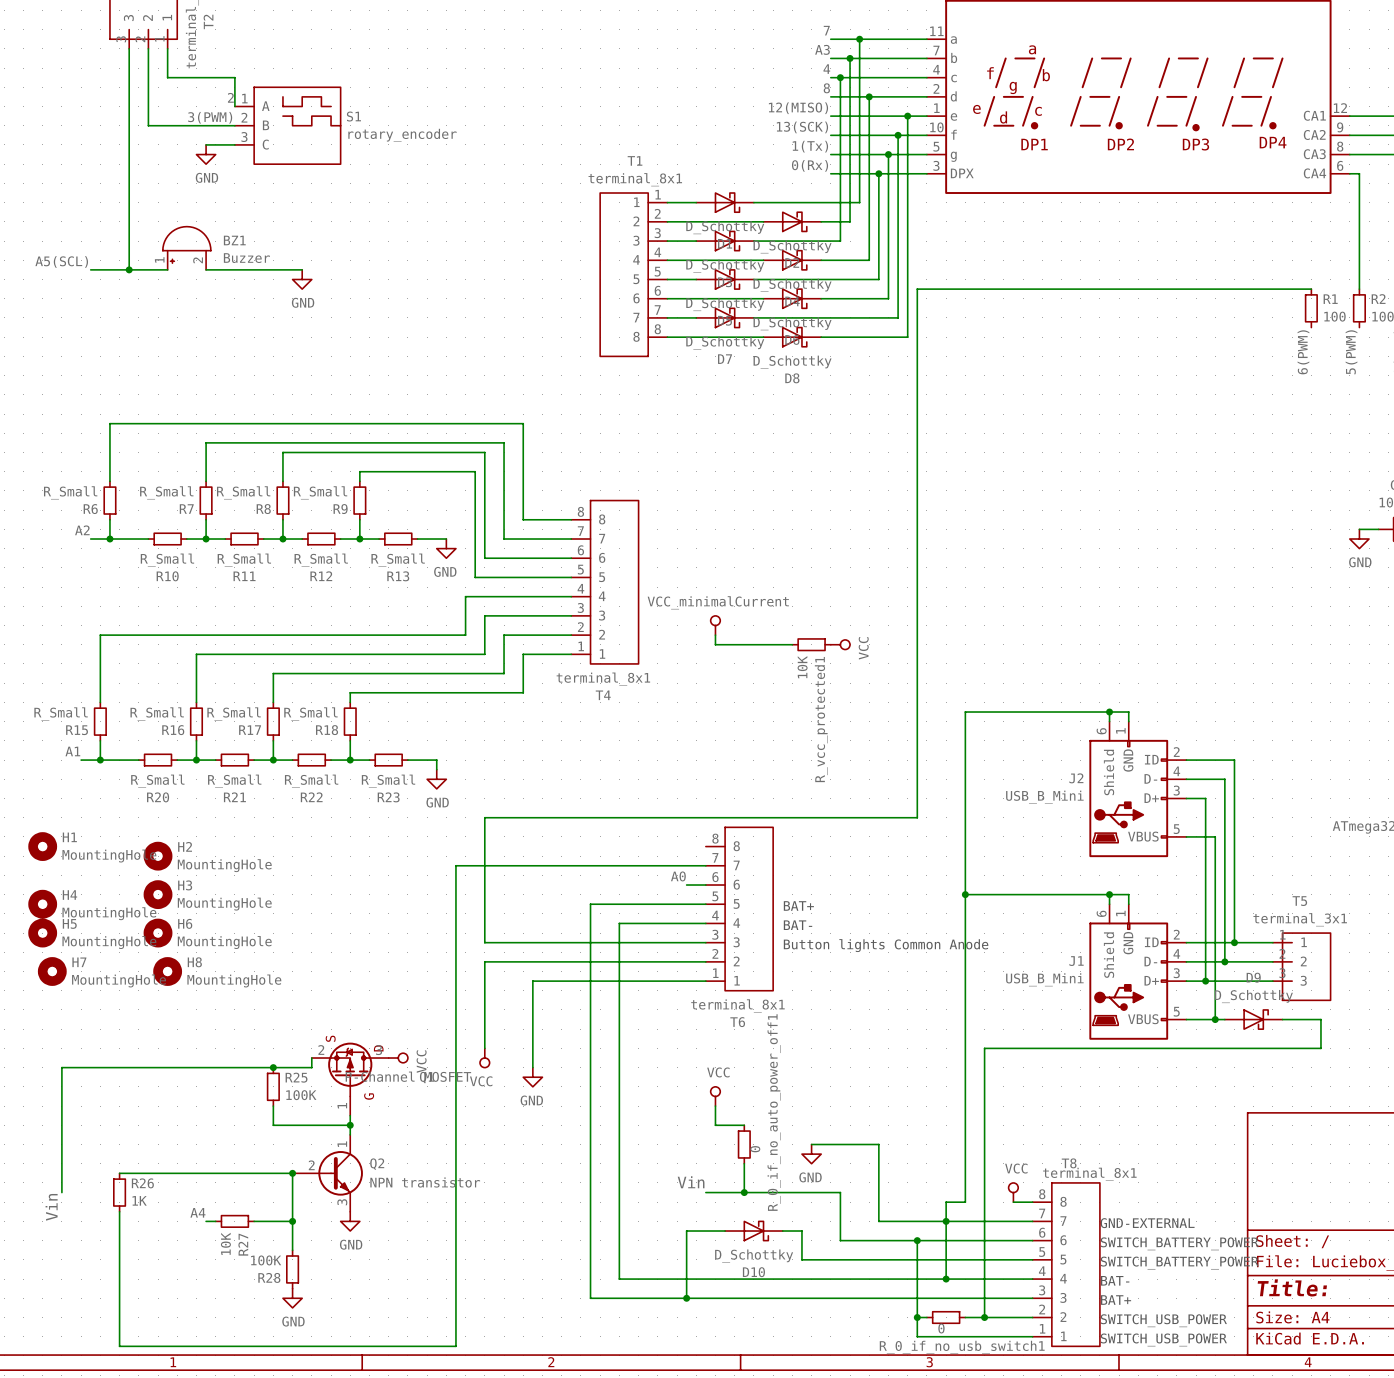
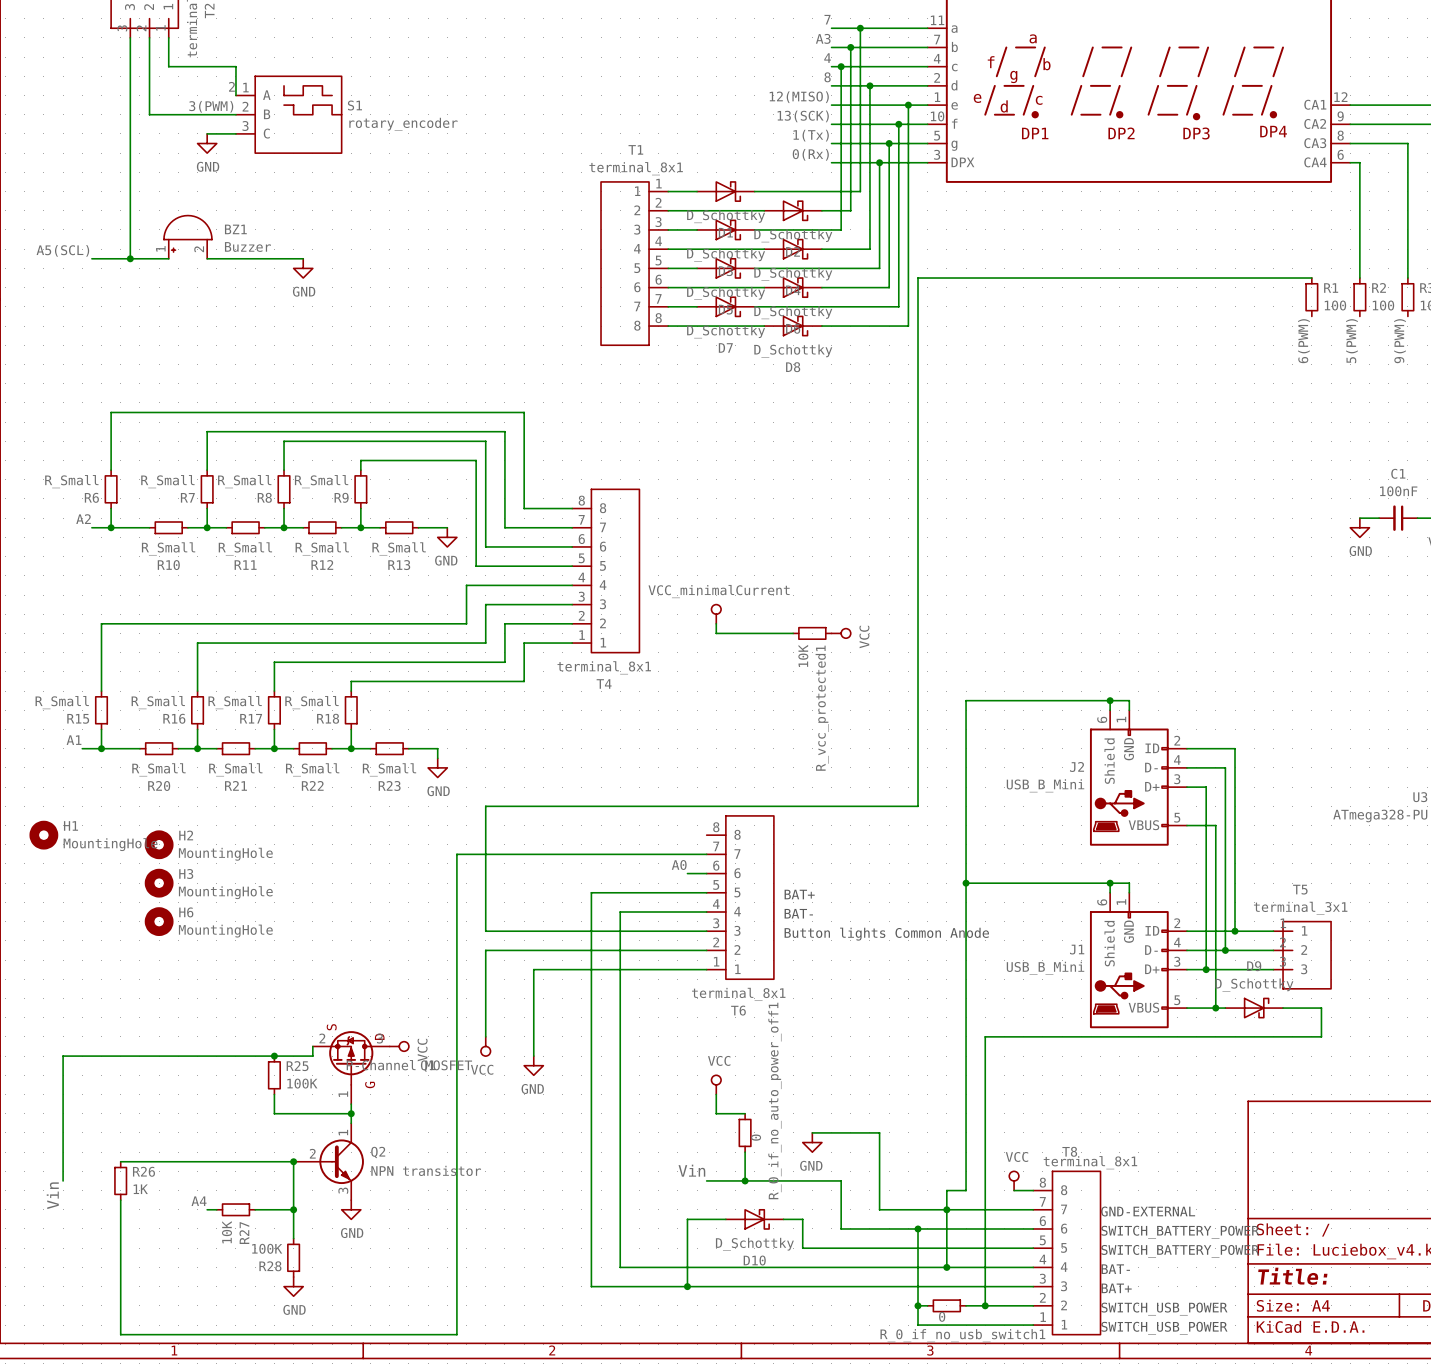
H4: MountingHole (42, 904) -> none
H5: MountingHole (42, 933) -> none
H7: MountingHole (52, 971) -> none
H8: MountingHole (167, 971) -> none

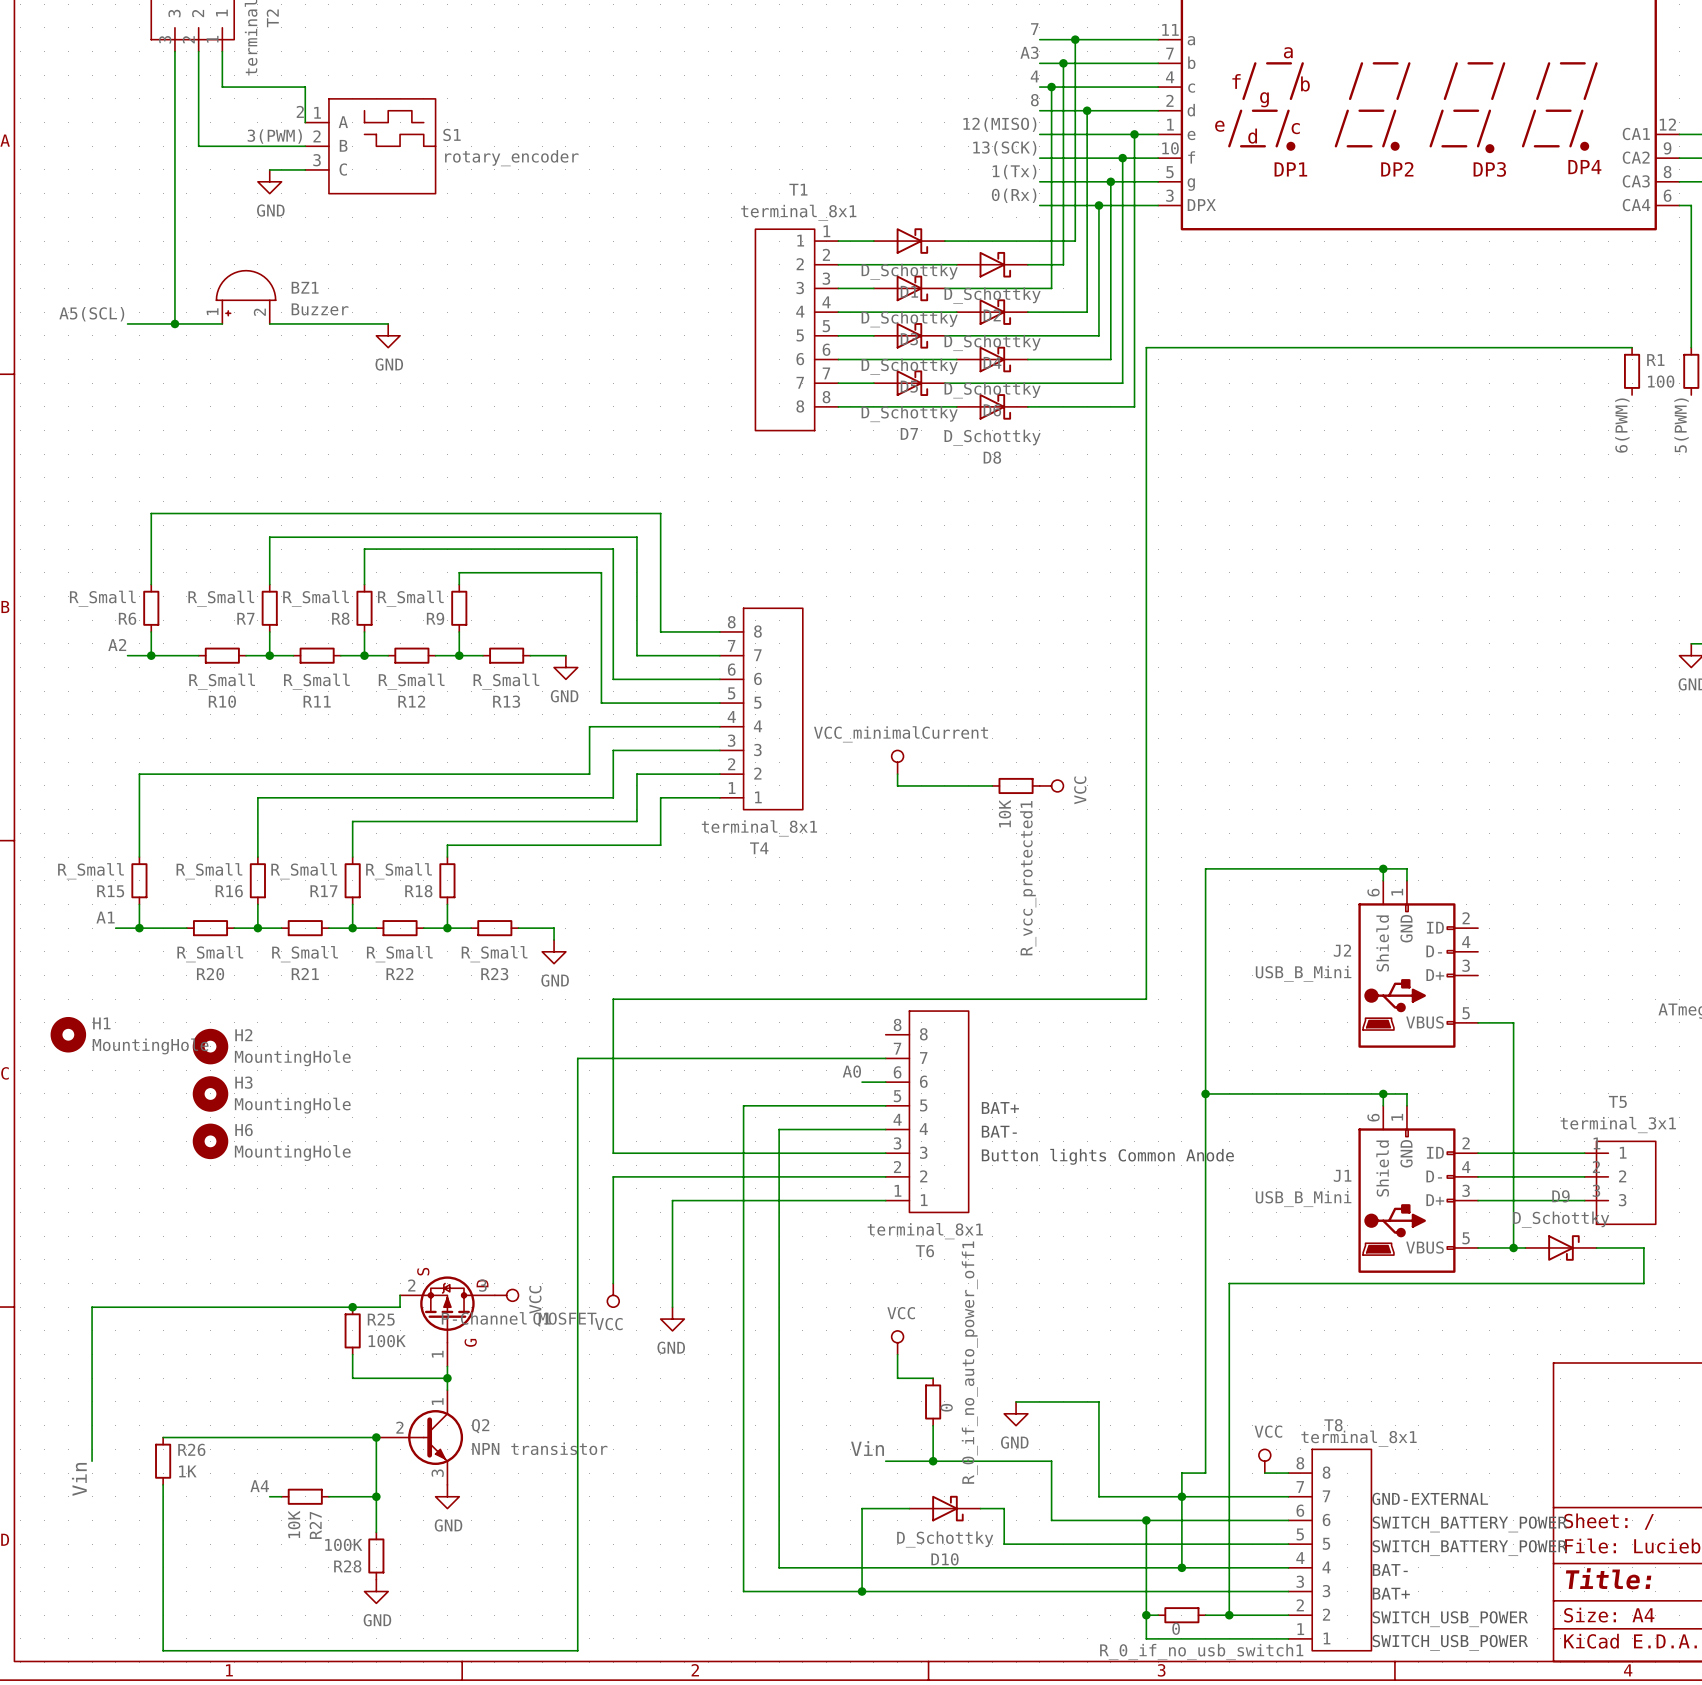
wire: (1186, 748) (1235, 748) (1235, 931) -> none
wire: (1186, 767) (1225, 767) (1225, 950) -> none
wire: (1186, 787) (1206, 787) (1206, 969) -> none
junction: (1235, 931) -> none
junction: (1225, 950) -> none
junction: (1206, 969) -> none

